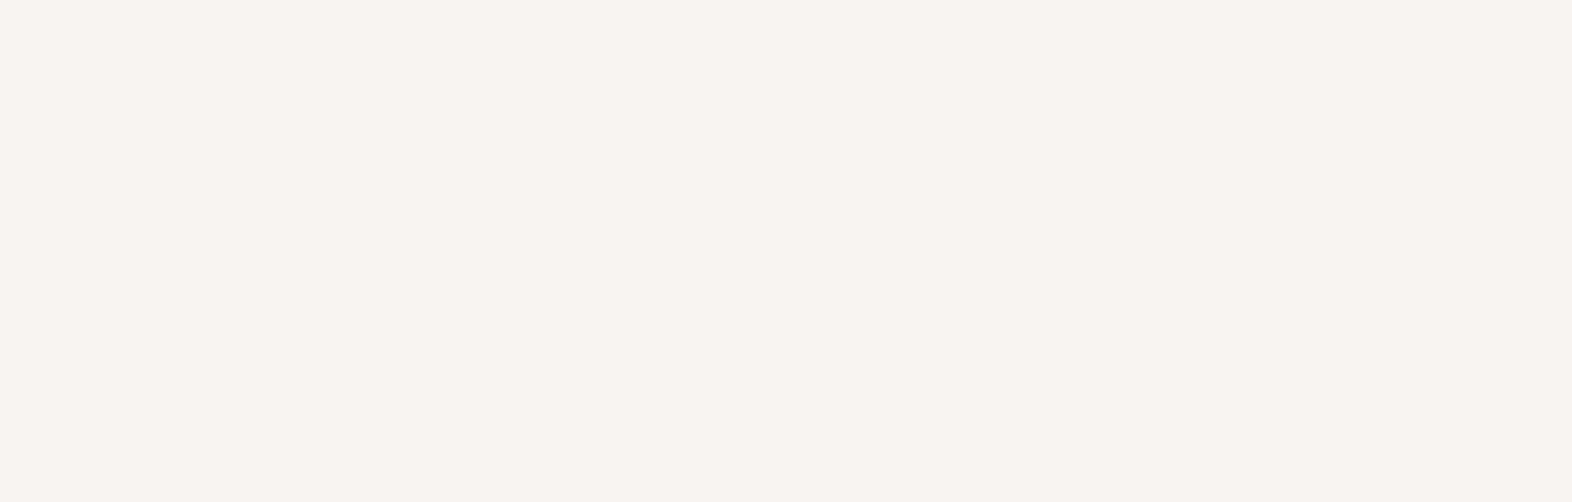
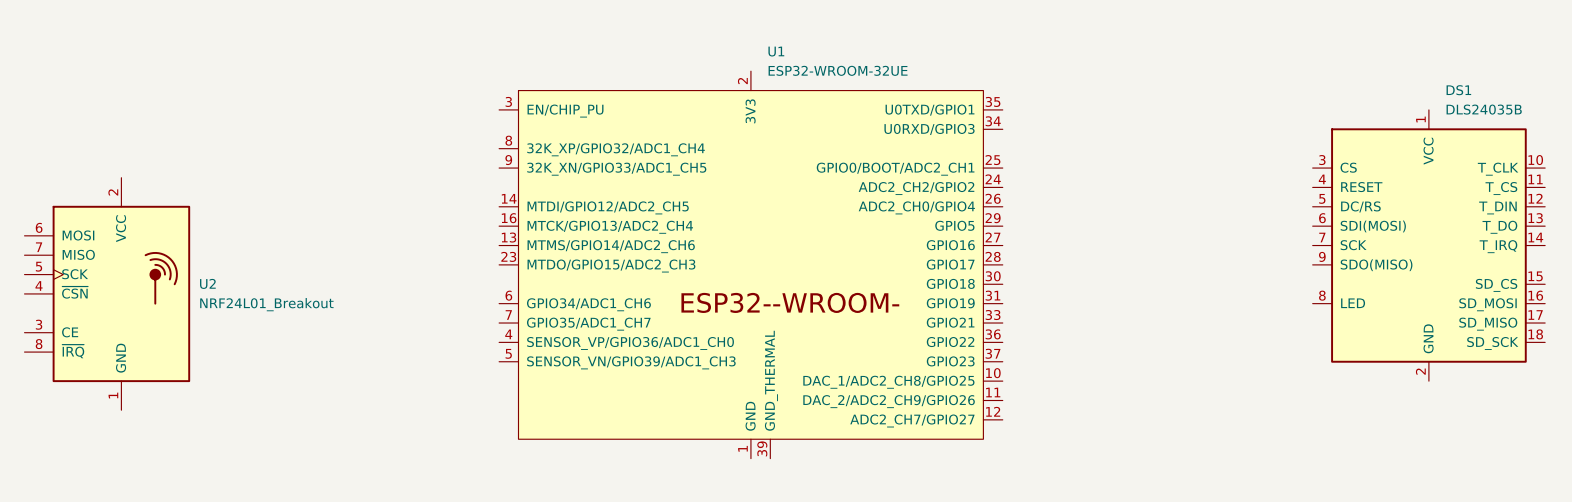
DS1: none -> DLS24035B (1428, 245)
U1: none -> ESP32-WROOM-32UE (750, 264)
U2: none -> NRF24L01_Breakout (107, 293)

